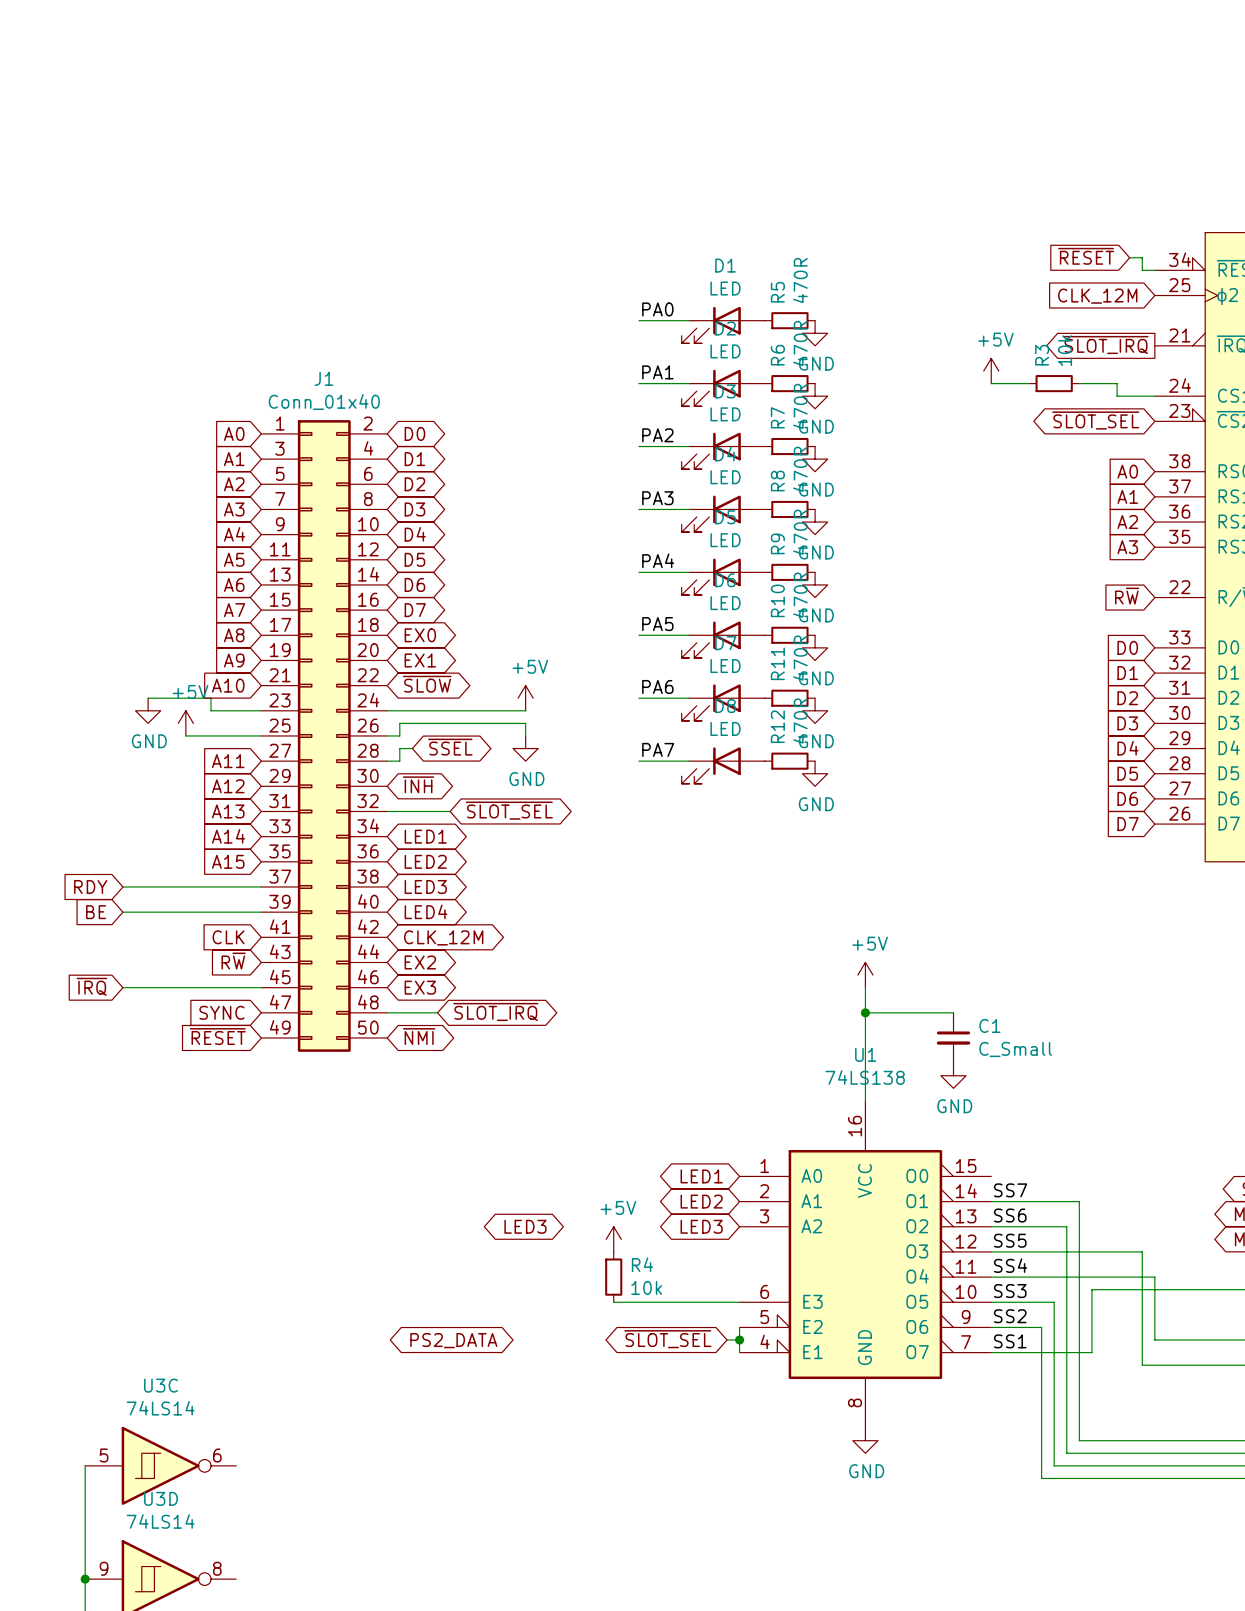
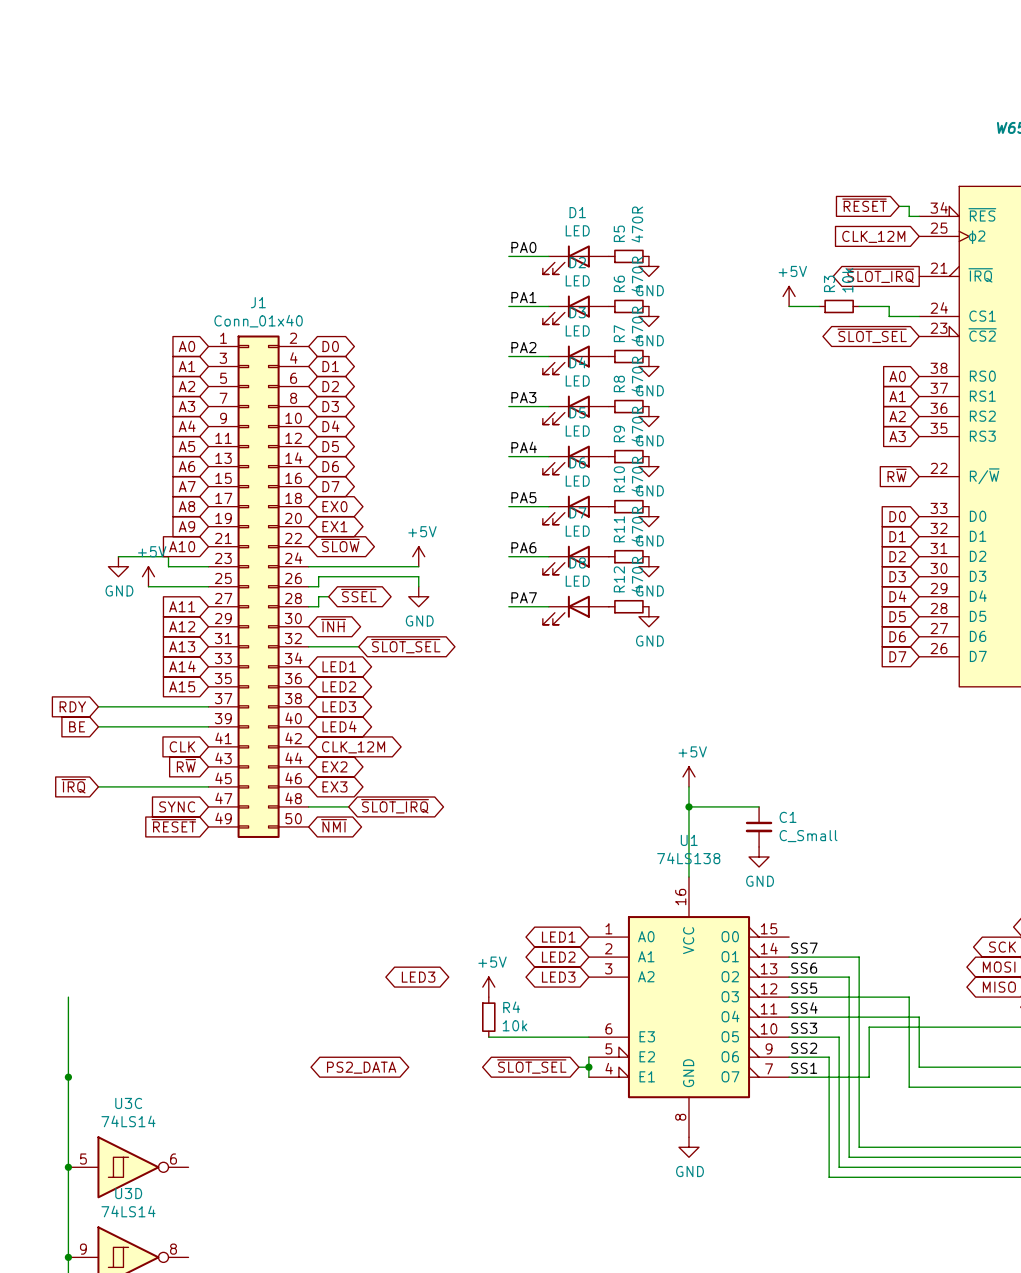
wire: none -> (68, 997) (68, 1167)
junction: none -> (68, 1077)
junction: none -> (68, 1167)

